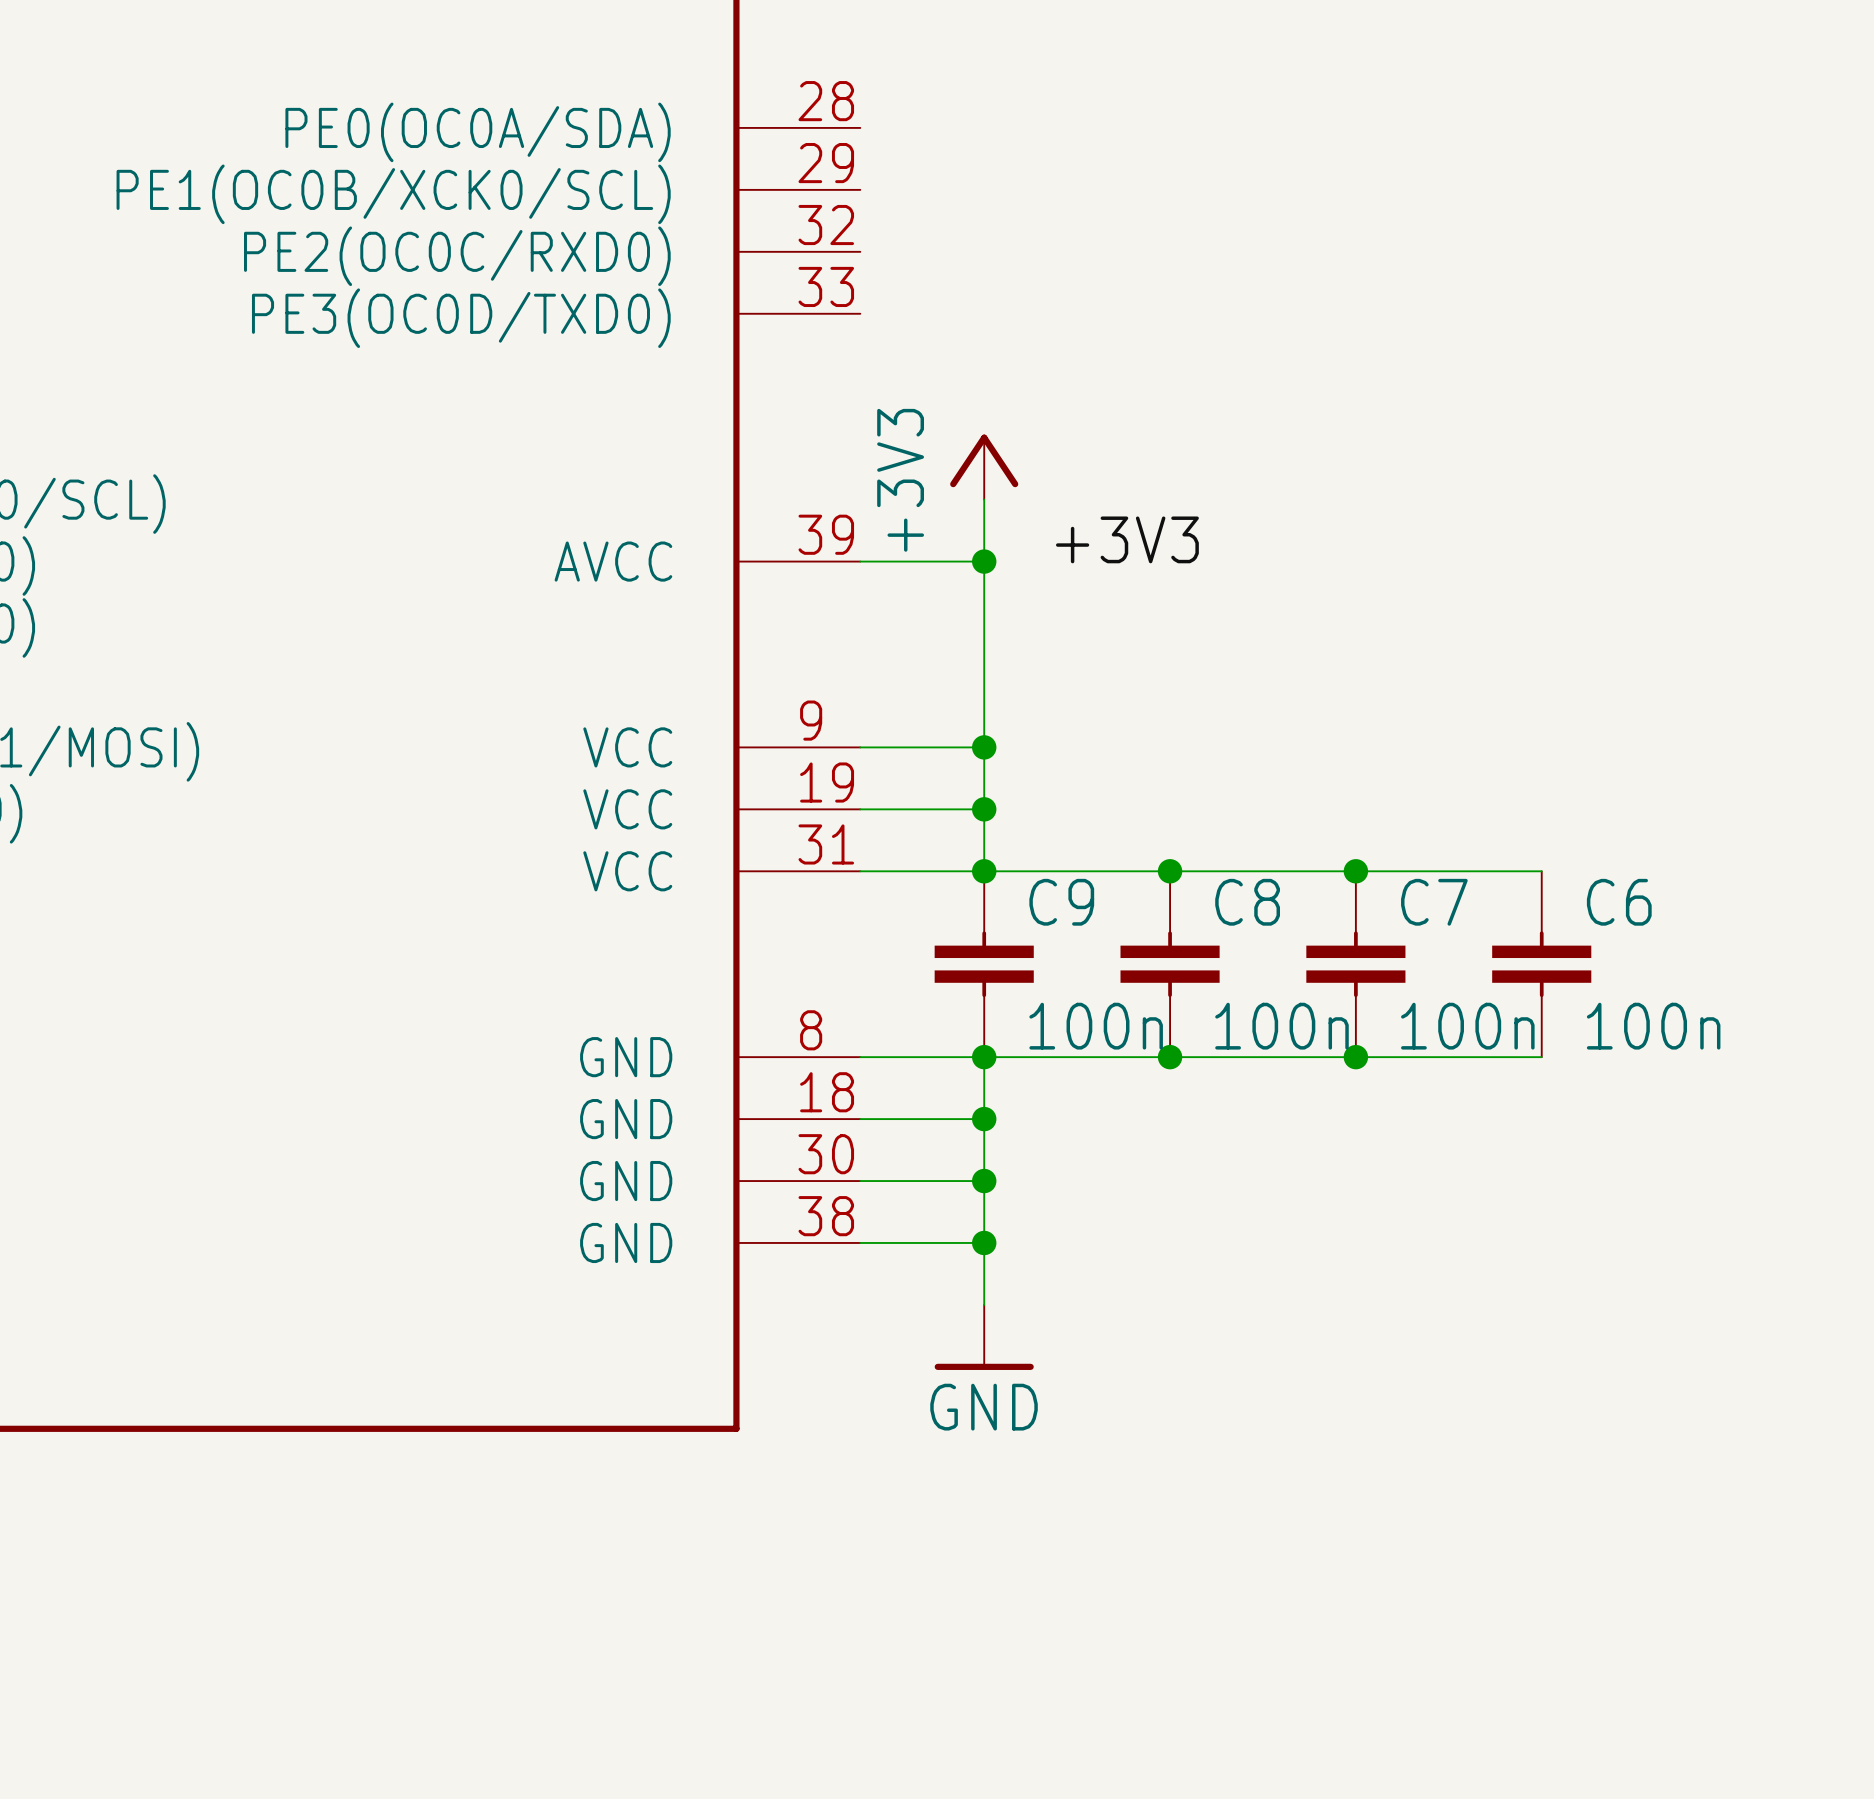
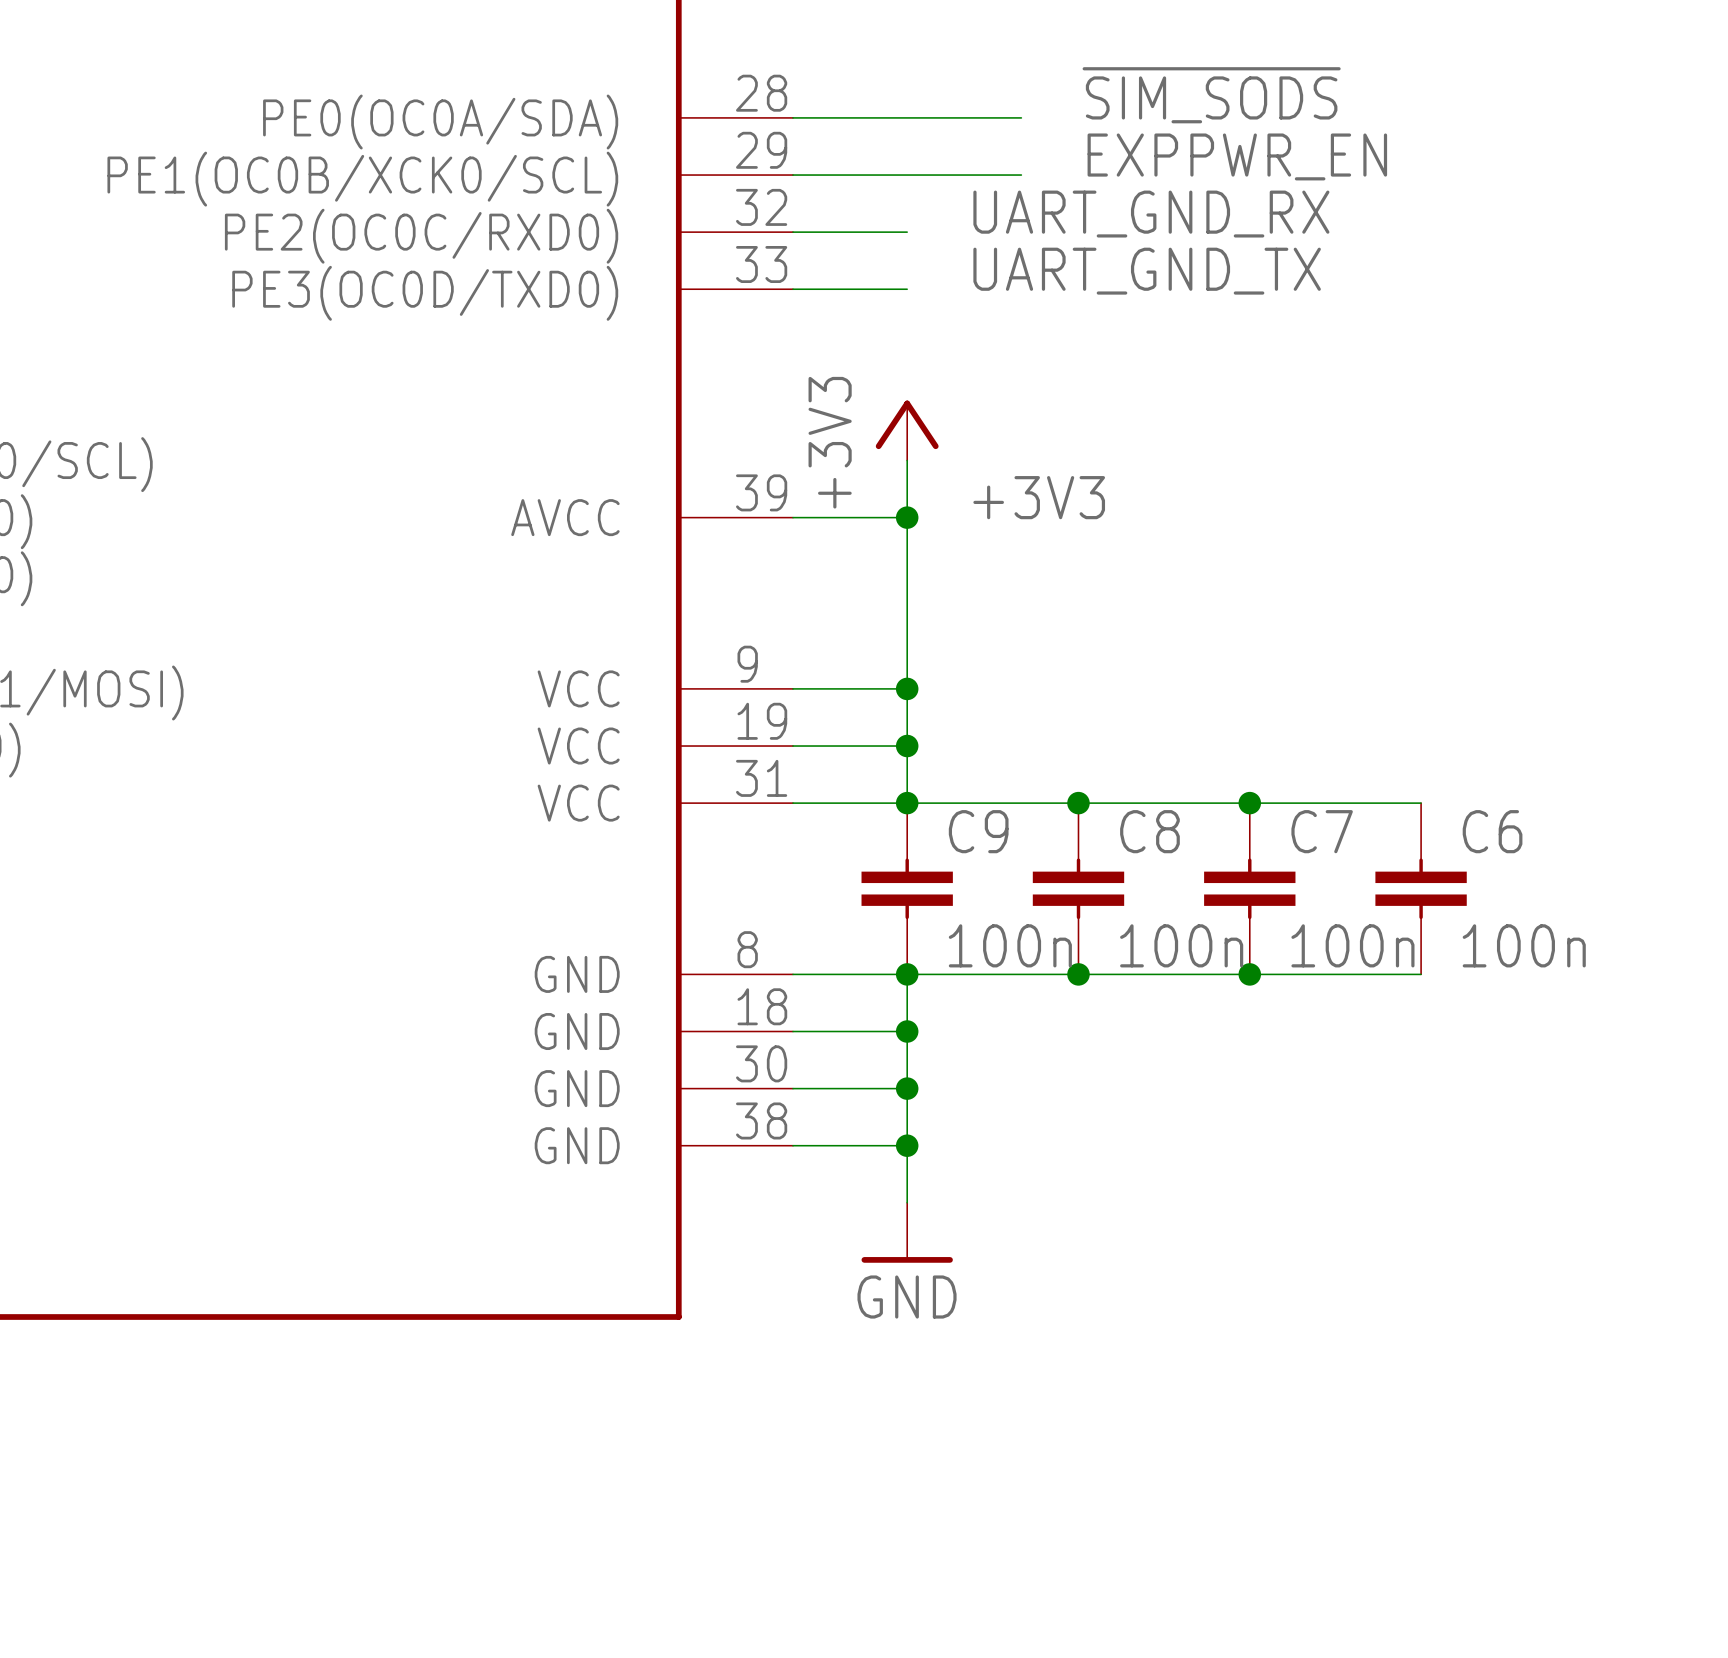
label: none -> ~{SIM_SODS} (1211, 95)
wire: none -> (793, 117) (1021, 117)
label: none -> EXPPWR_EN (1237, 156)
wire: none -> (793, 175) (1021, 175)
label: none -> UART_GND_RX (1151, 214)
wire: none -> (793, 232) (907, 232)
label: none -> UART_GND_TX (1147, 271)
wire: none -> (793, 289) (907, 289)

